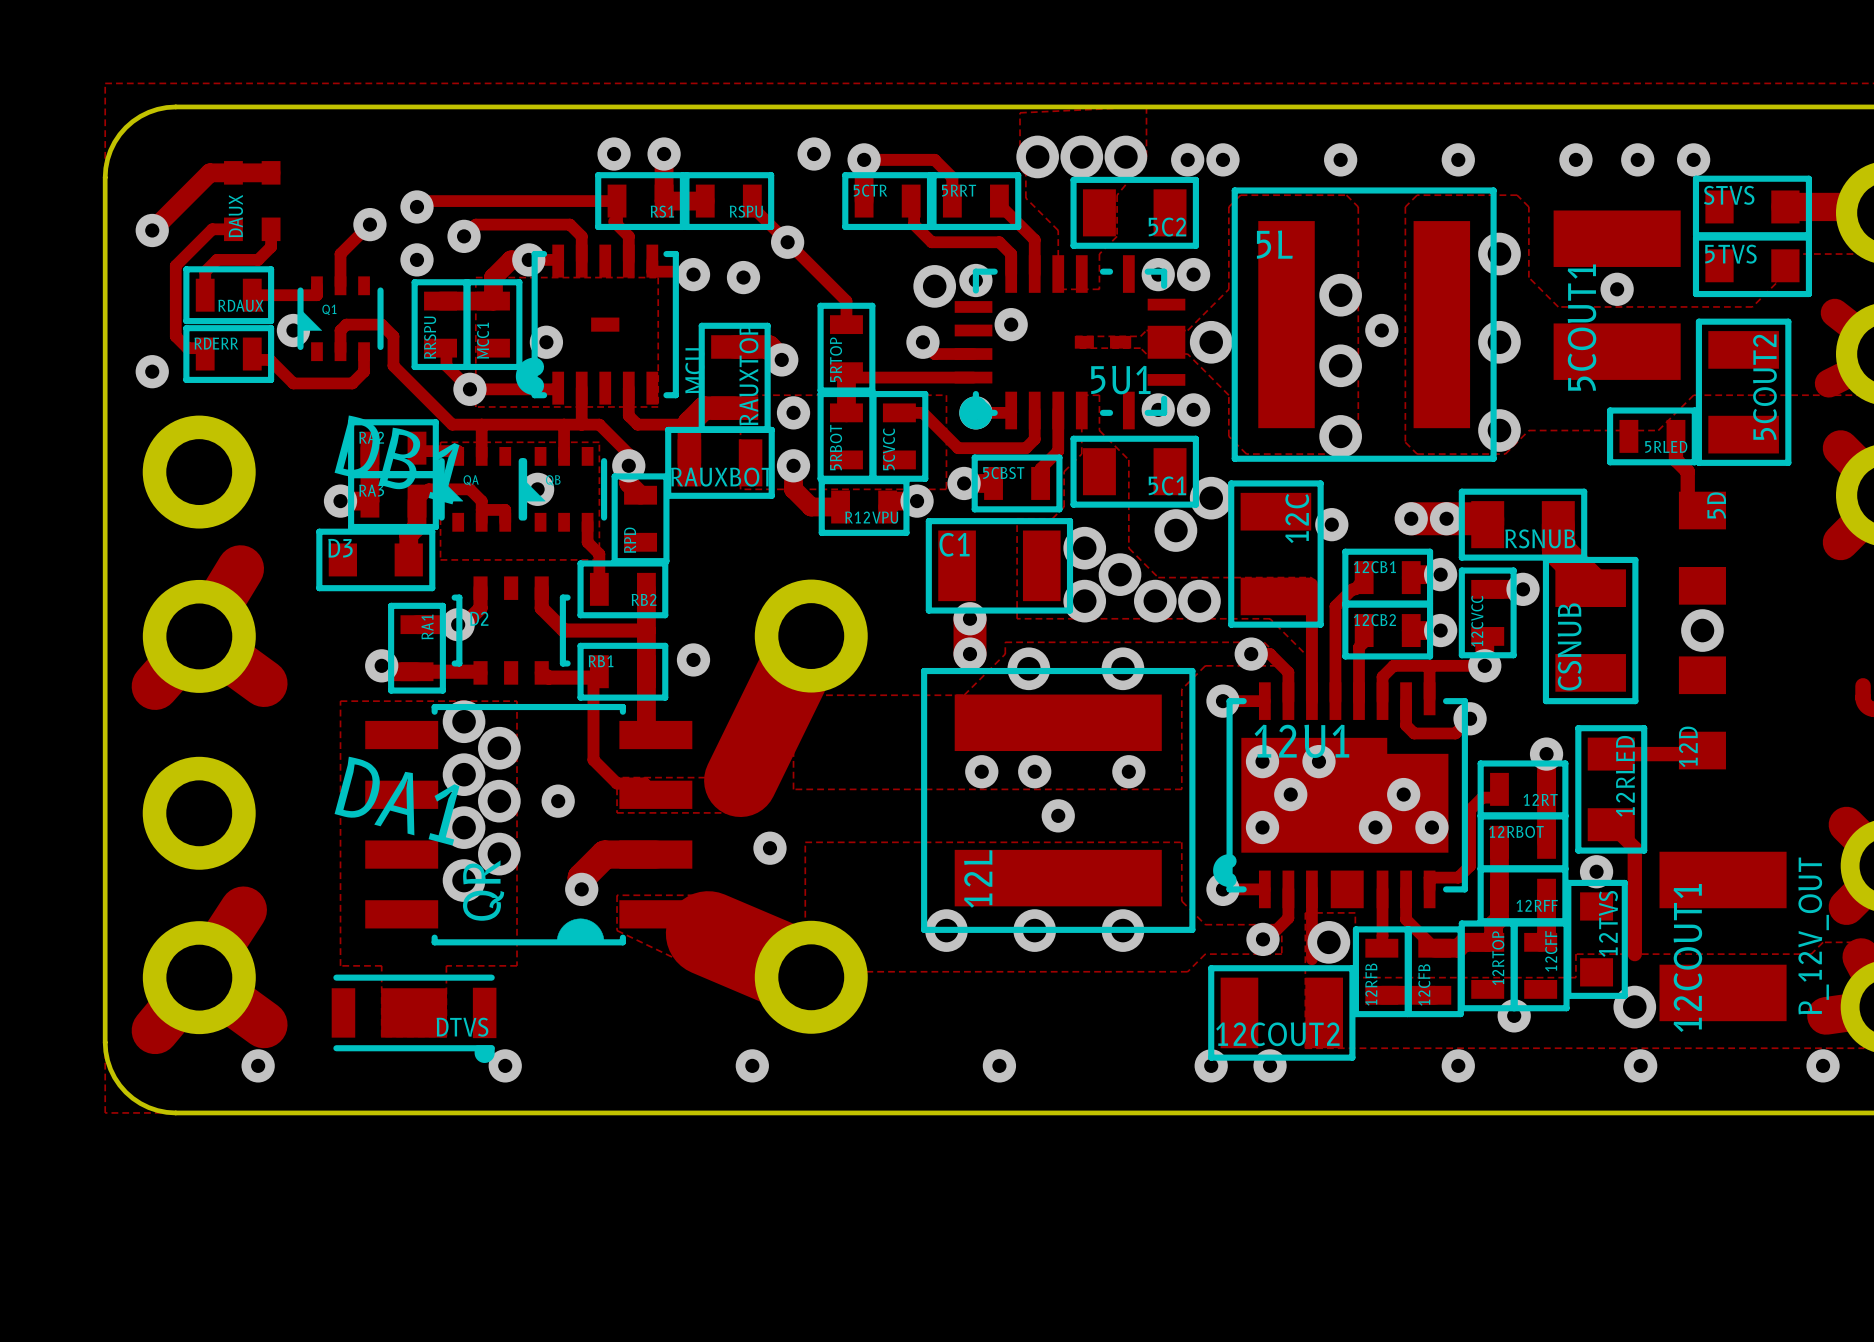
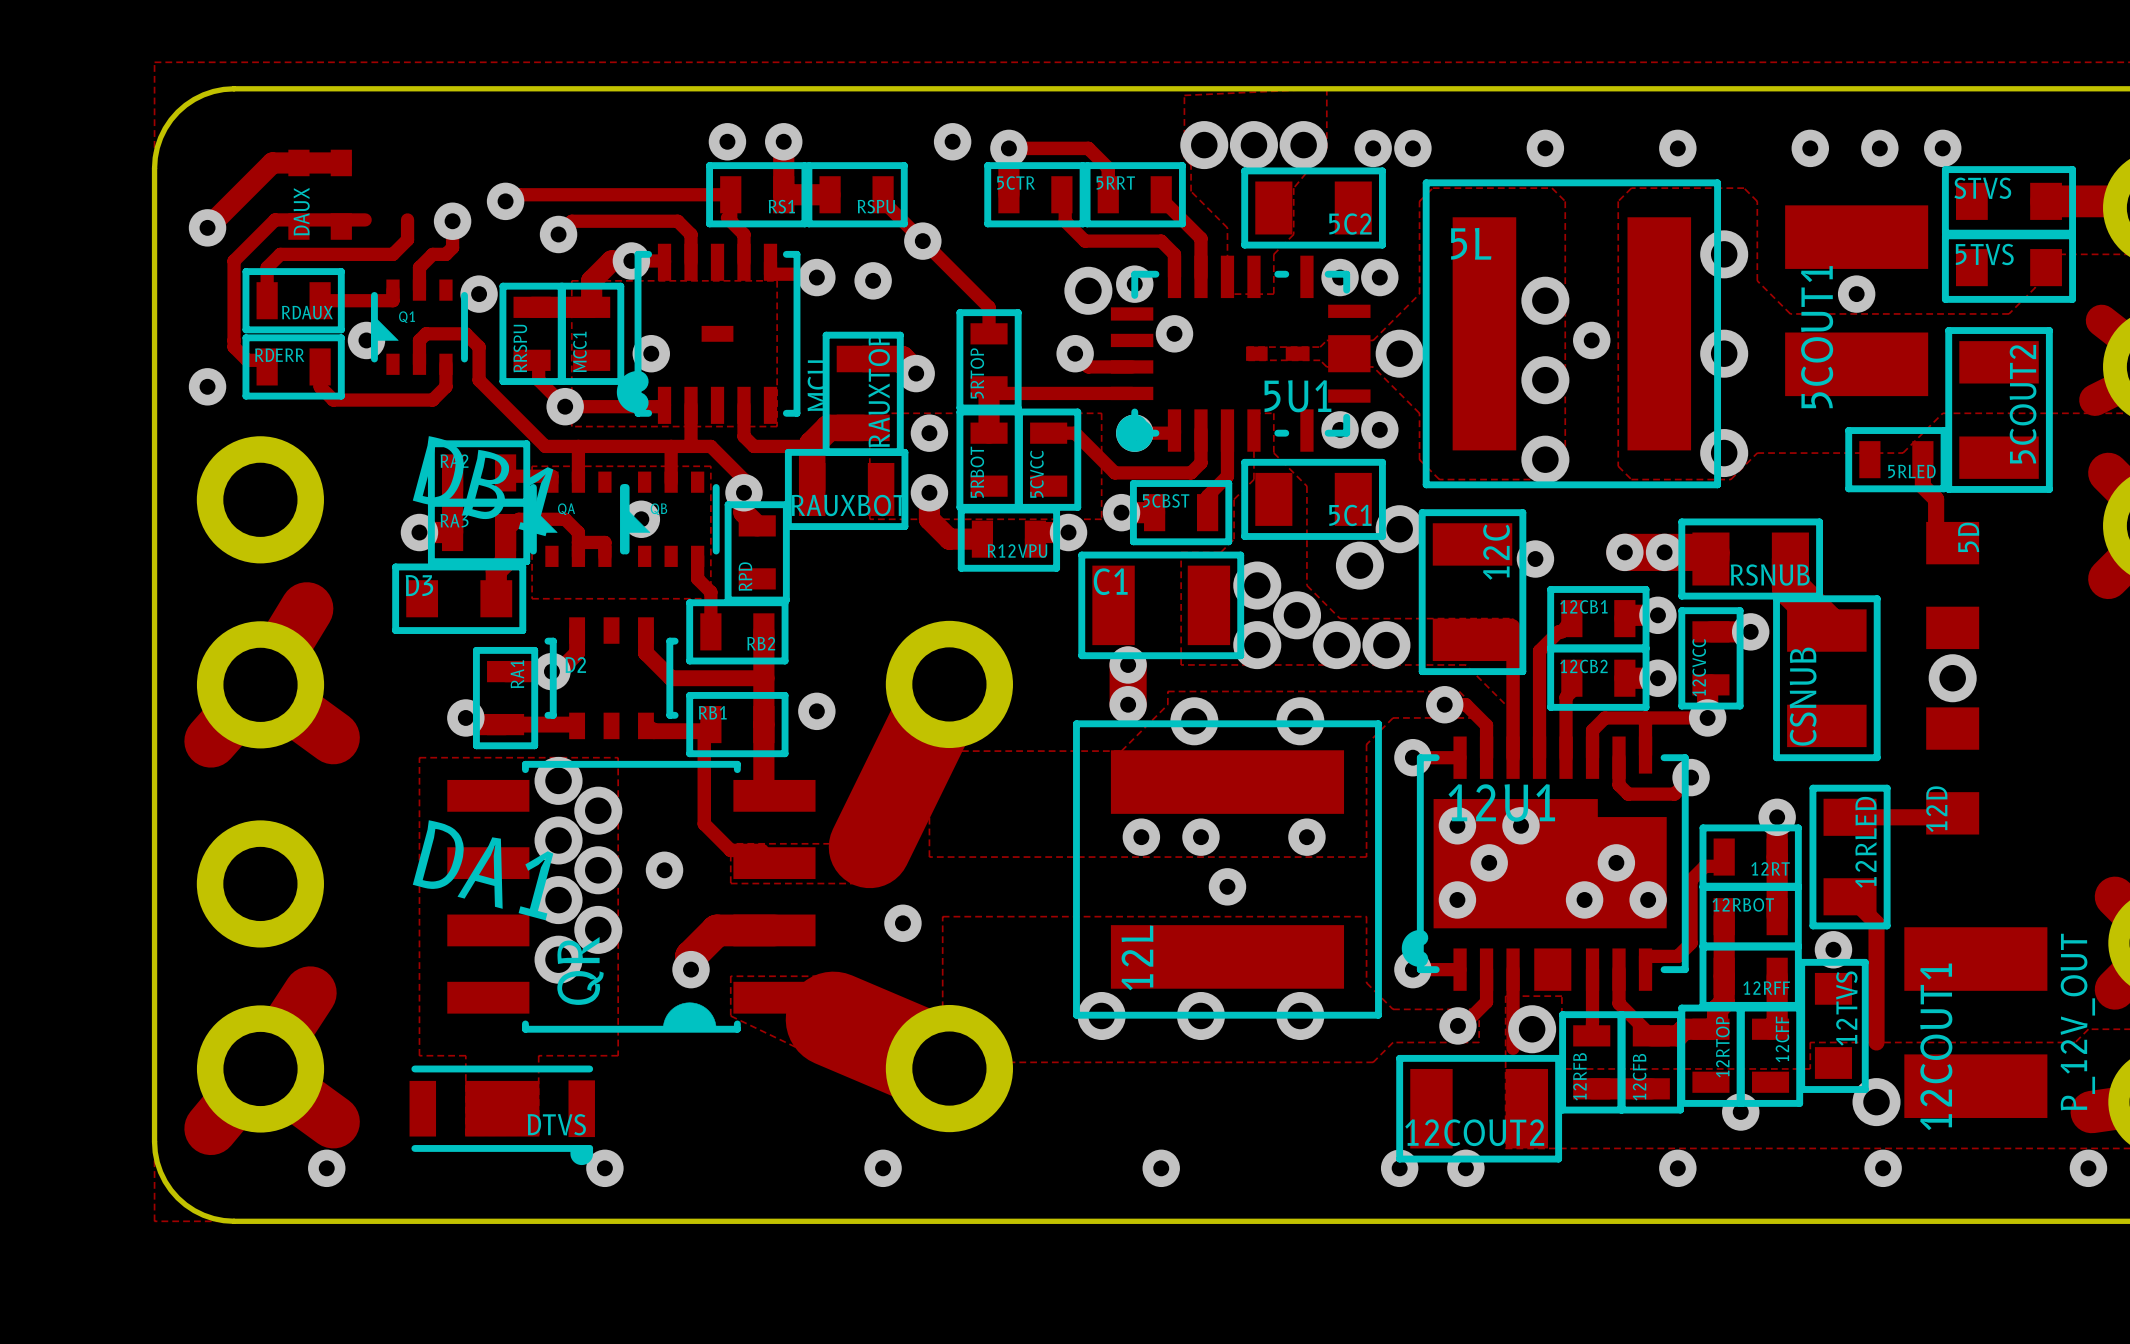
track: (369, 224) (340, 254) (340, 265) -> (452, 221) (452, 247) (445, 254) (432, 254) (419, 267)
track: (233, 229) (212, 229) (175, 265) -> (365, 219) (275, 219) (234, 260) (234, 267)
track: (271, 229) (271, 246) (258, 259) (216, 259) (205, 271) -> (407, 219) (407, 239) (392, 254) (280, 254) (267, 267) (267, 274)
via position: (416, 259) -> (479, 294)
track: (252, 354) (258, 359) (269, 359) (293, 383) -> (320, 360) (320, 386) (333, 400) (366, 400)

